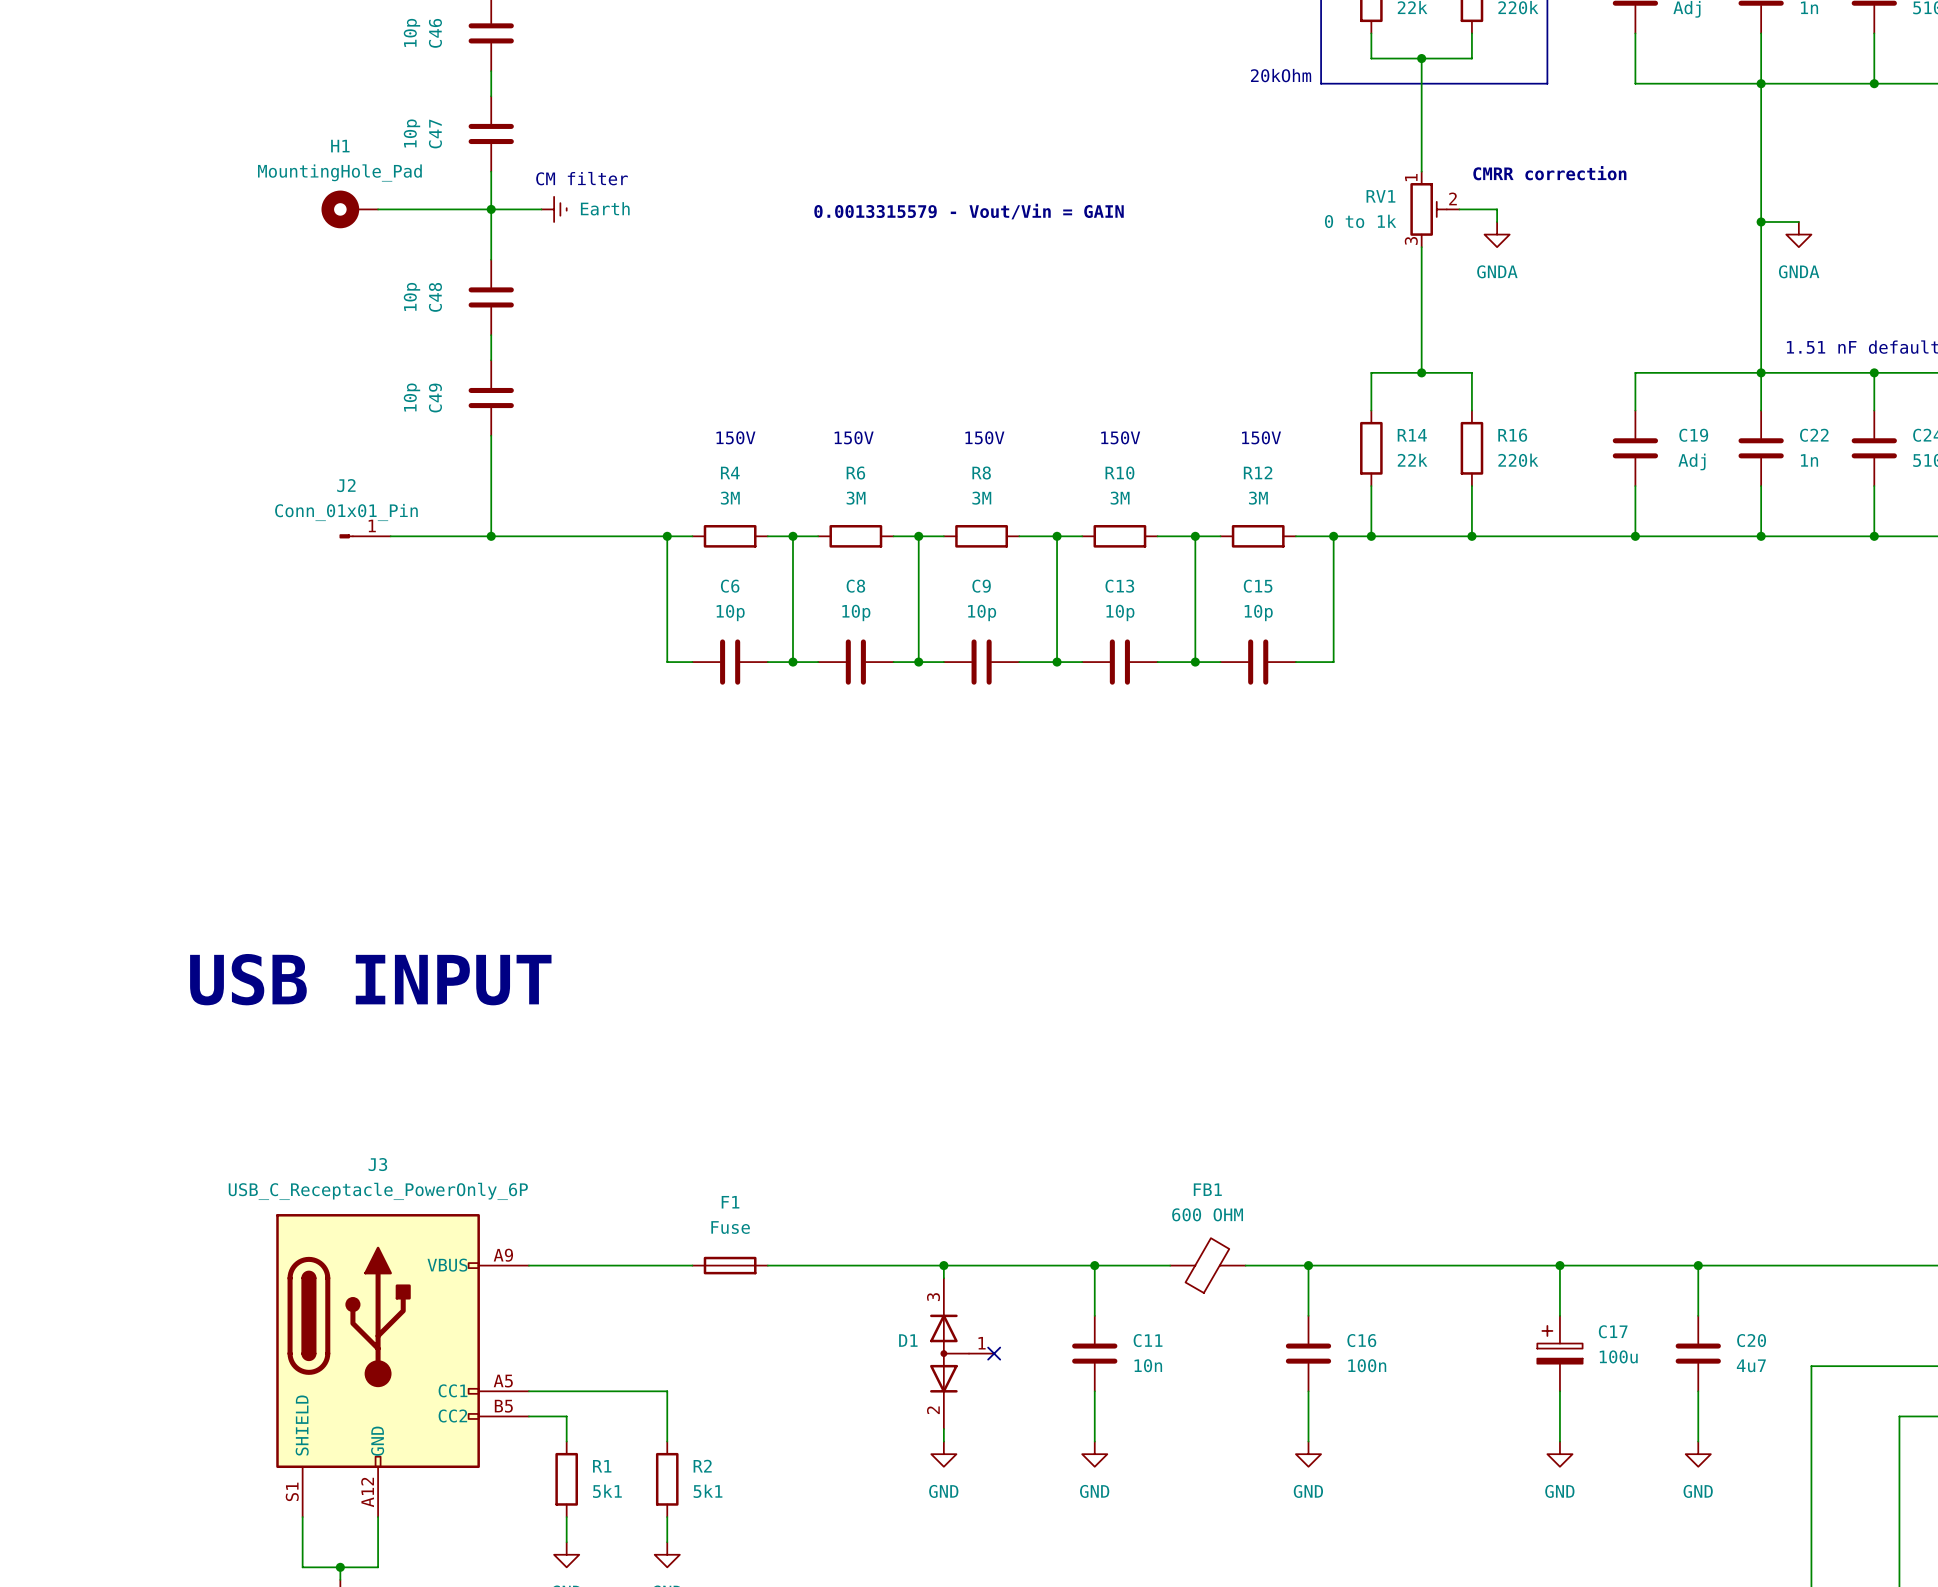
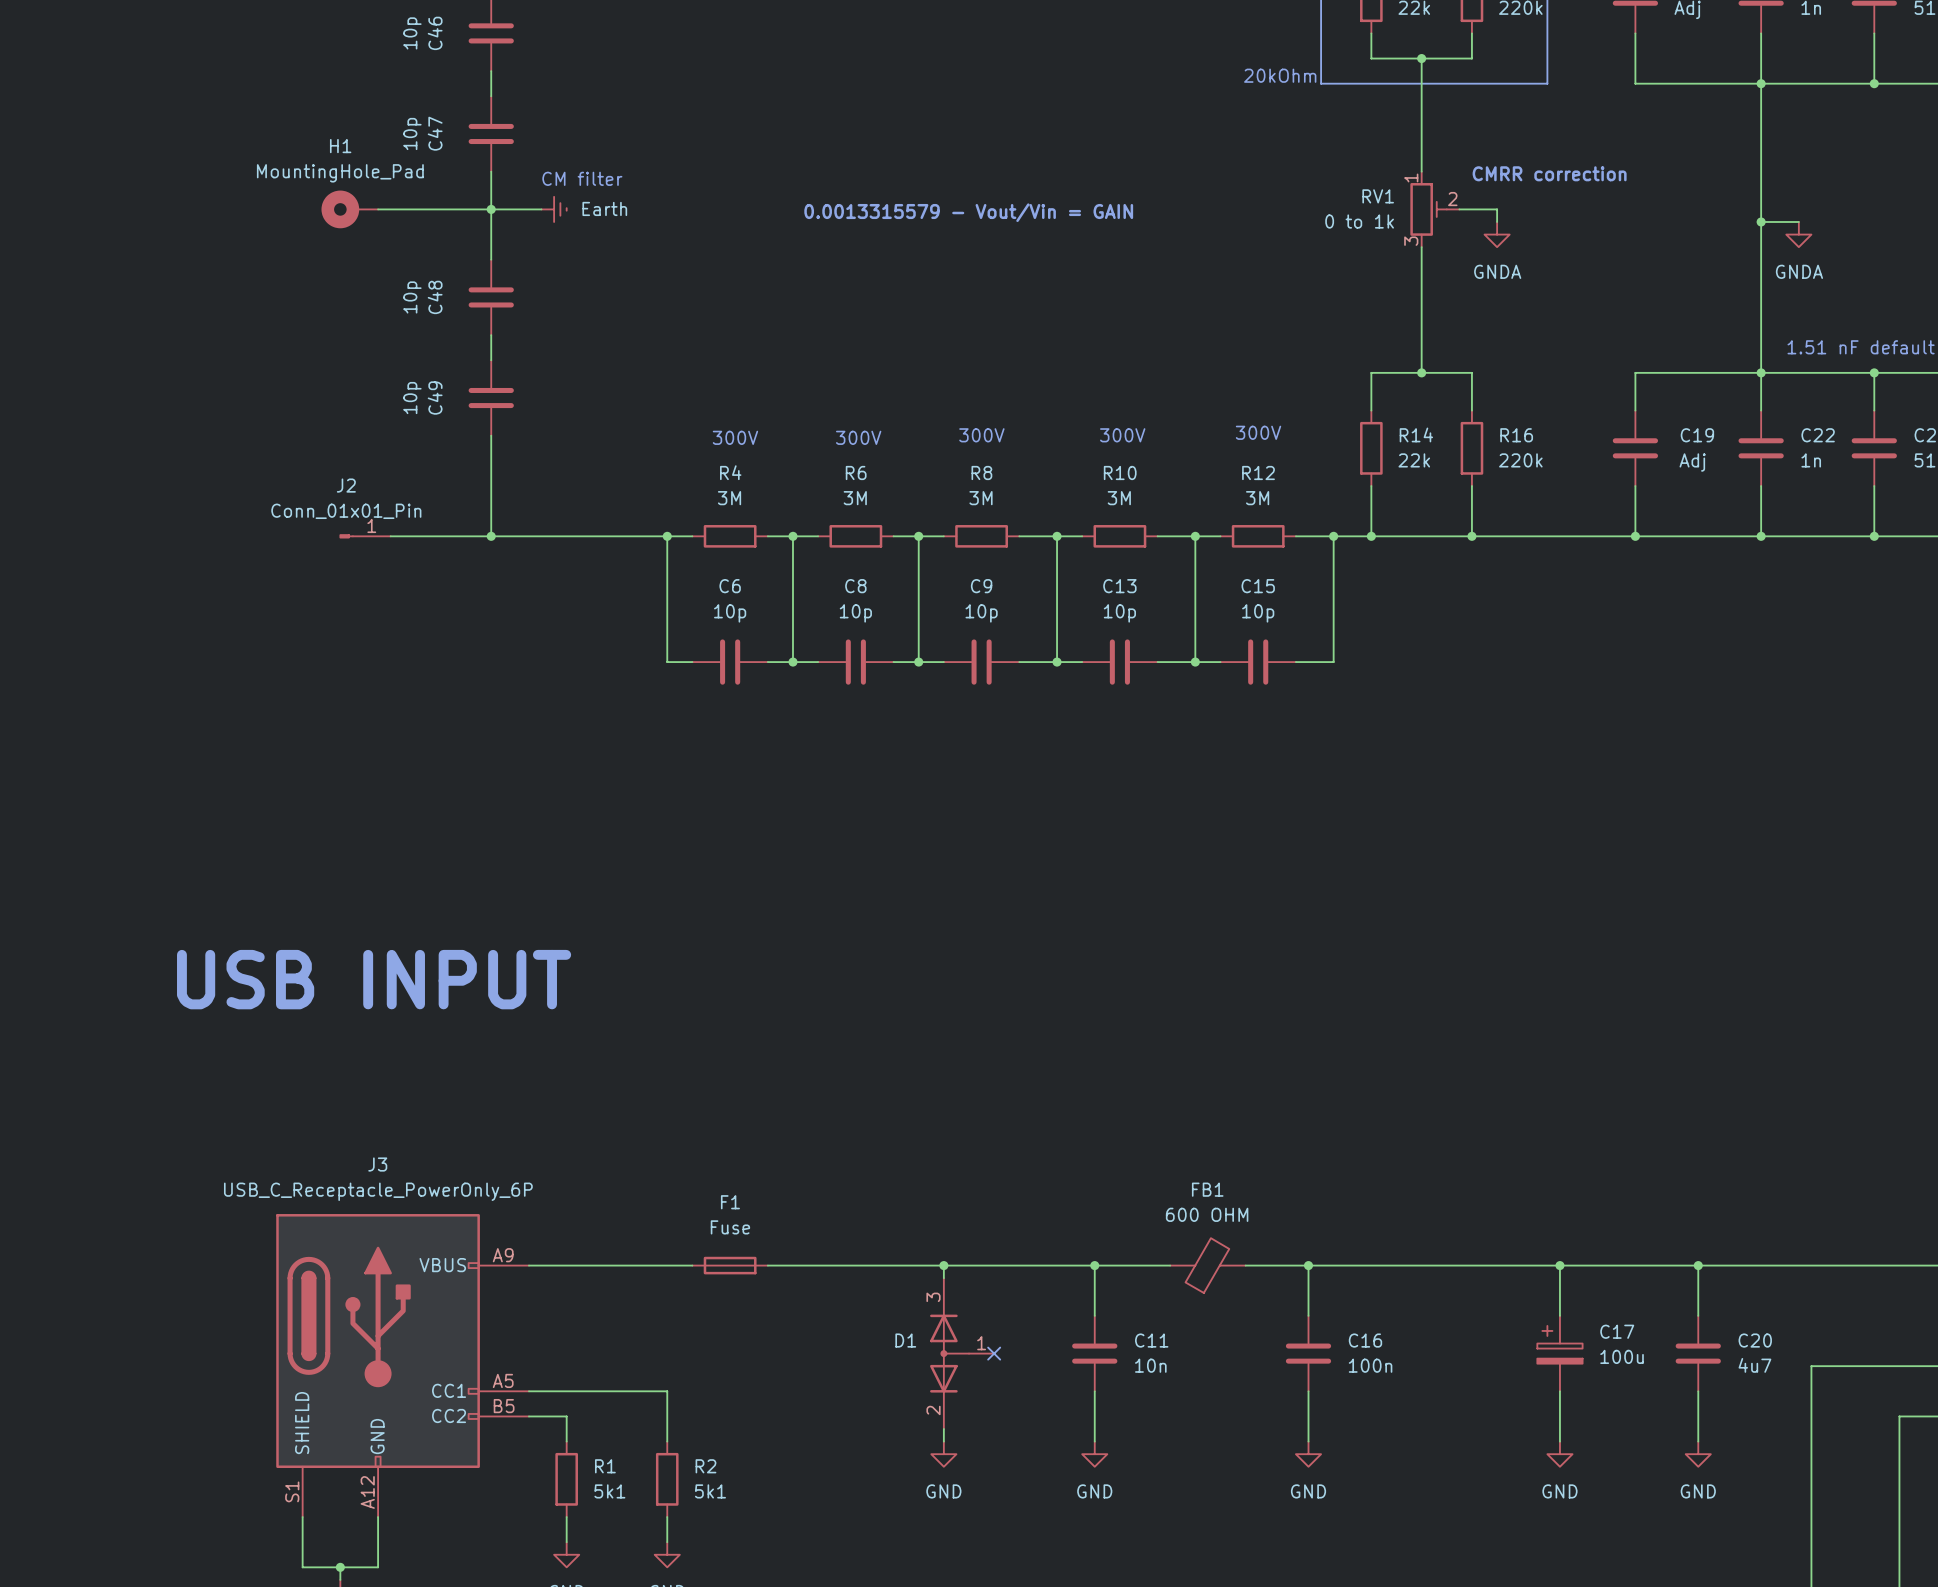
text: 150V (735, 437) -> 300V (735, 437)
text: 150V (854, 437) -> 300V (858, 437)
text: 150V (984, 437) -> 300V (981, 435)
text: 150V (1120, 437) -> 300V (1122, 435)
text: 150V (1261, 437) -> 300V (1258, 432)

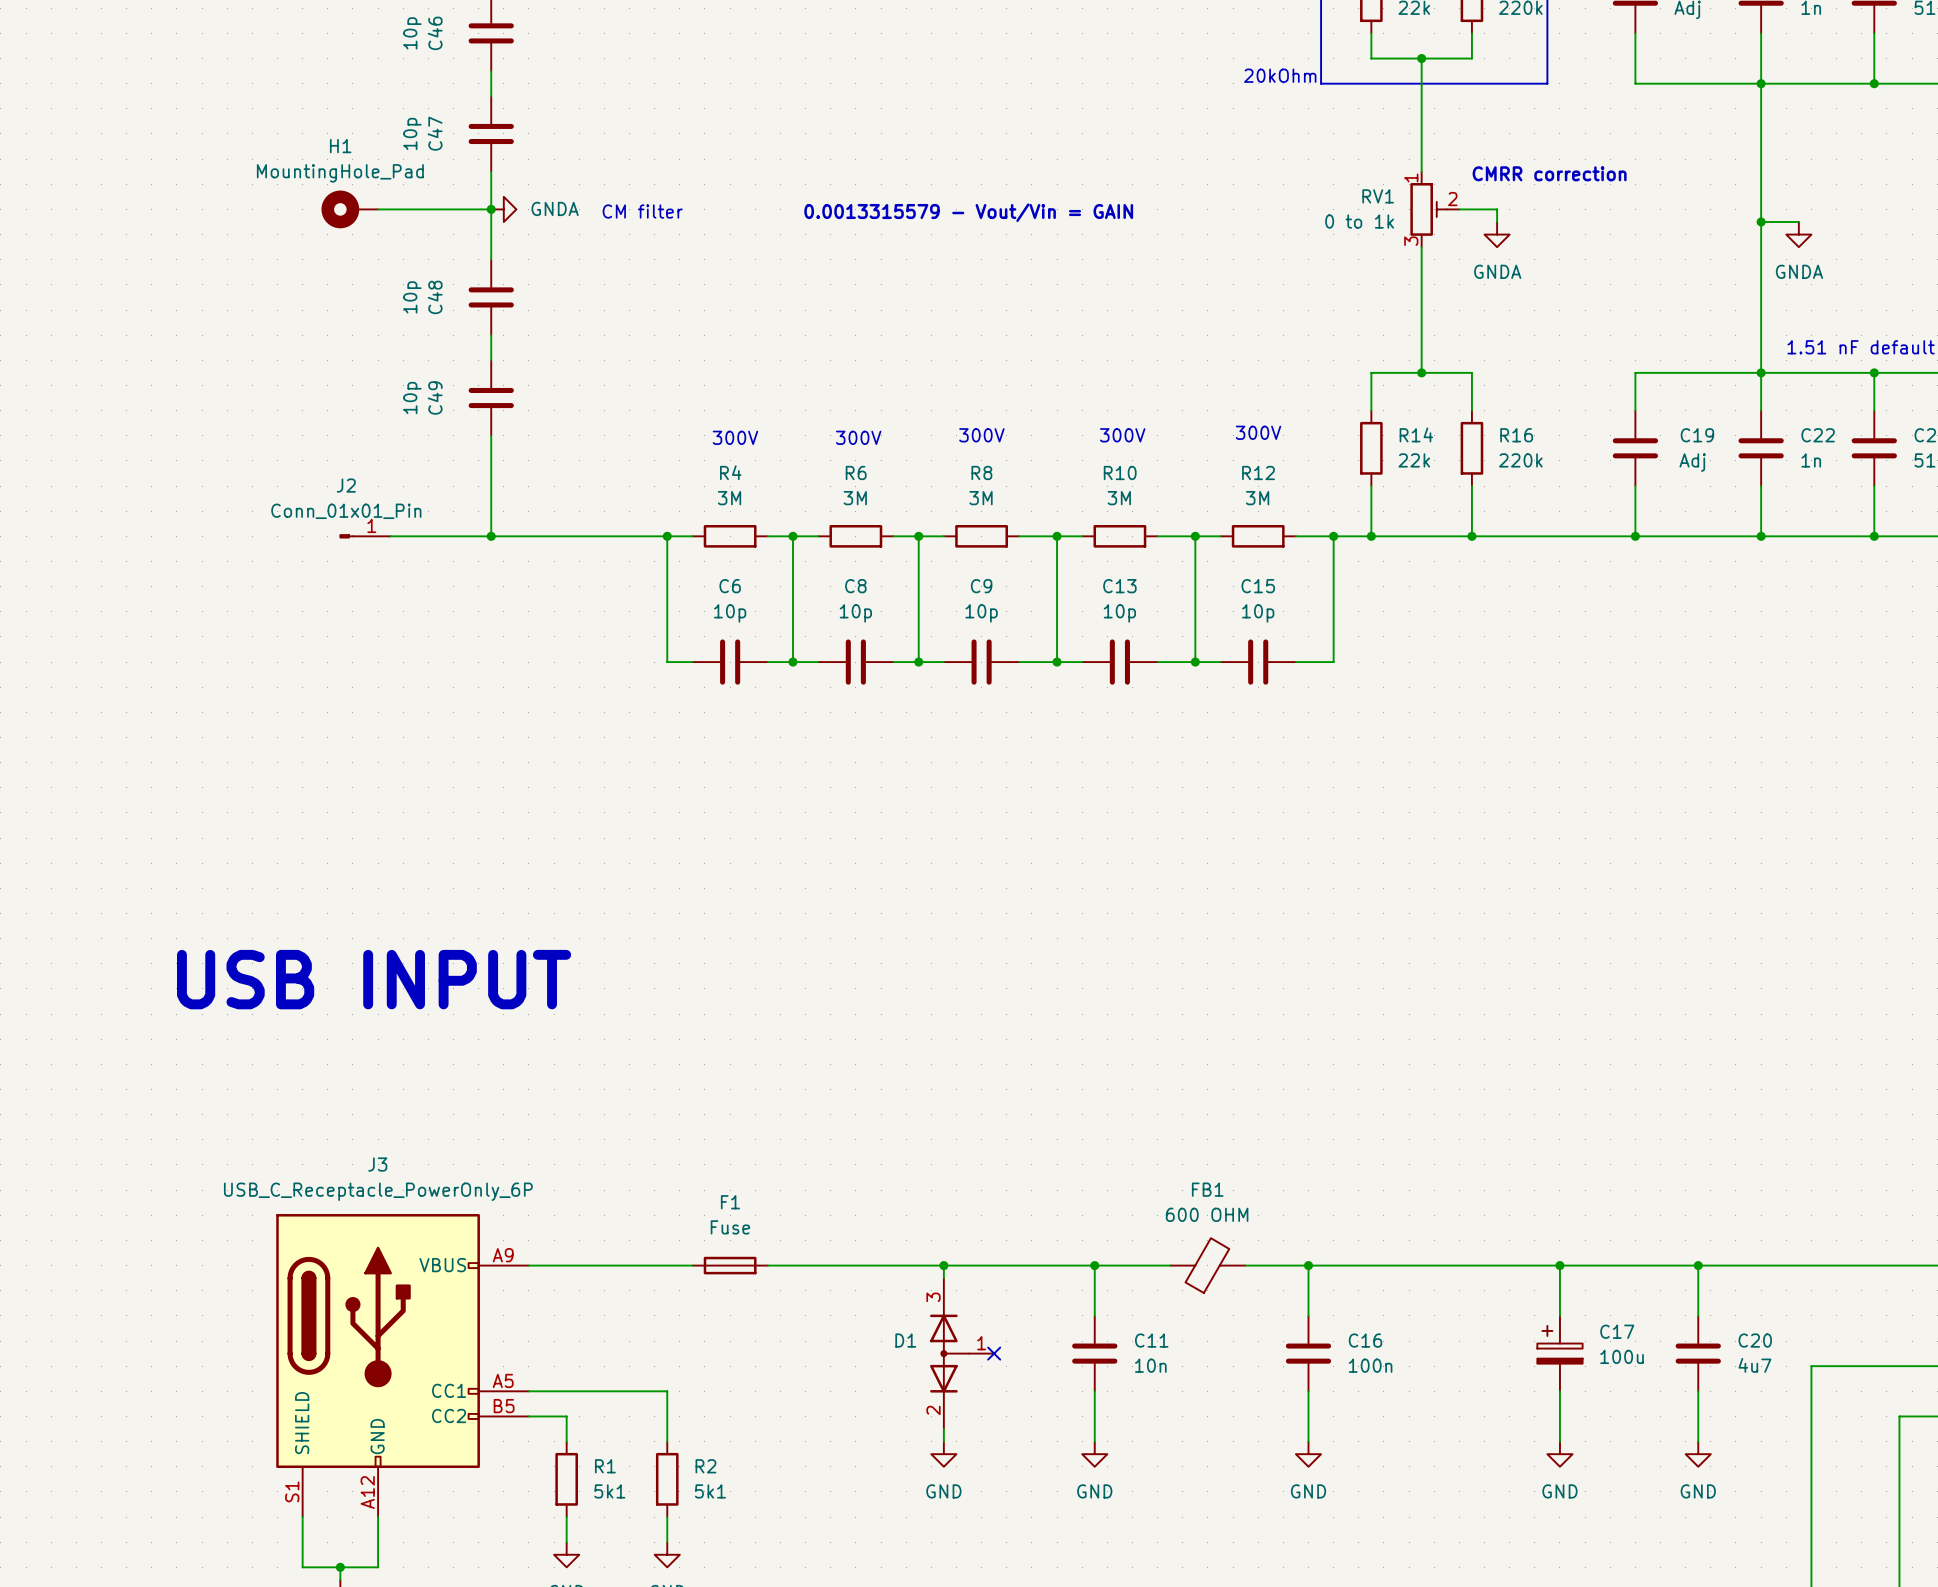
text position: CM filter (582, 178) -> CM filter (642, 211)
wire: (491, 209) (541, 209) -> none
power symbol: none -> GNDA (503, 209)
power symbol: Earth (554, 209) -> none

